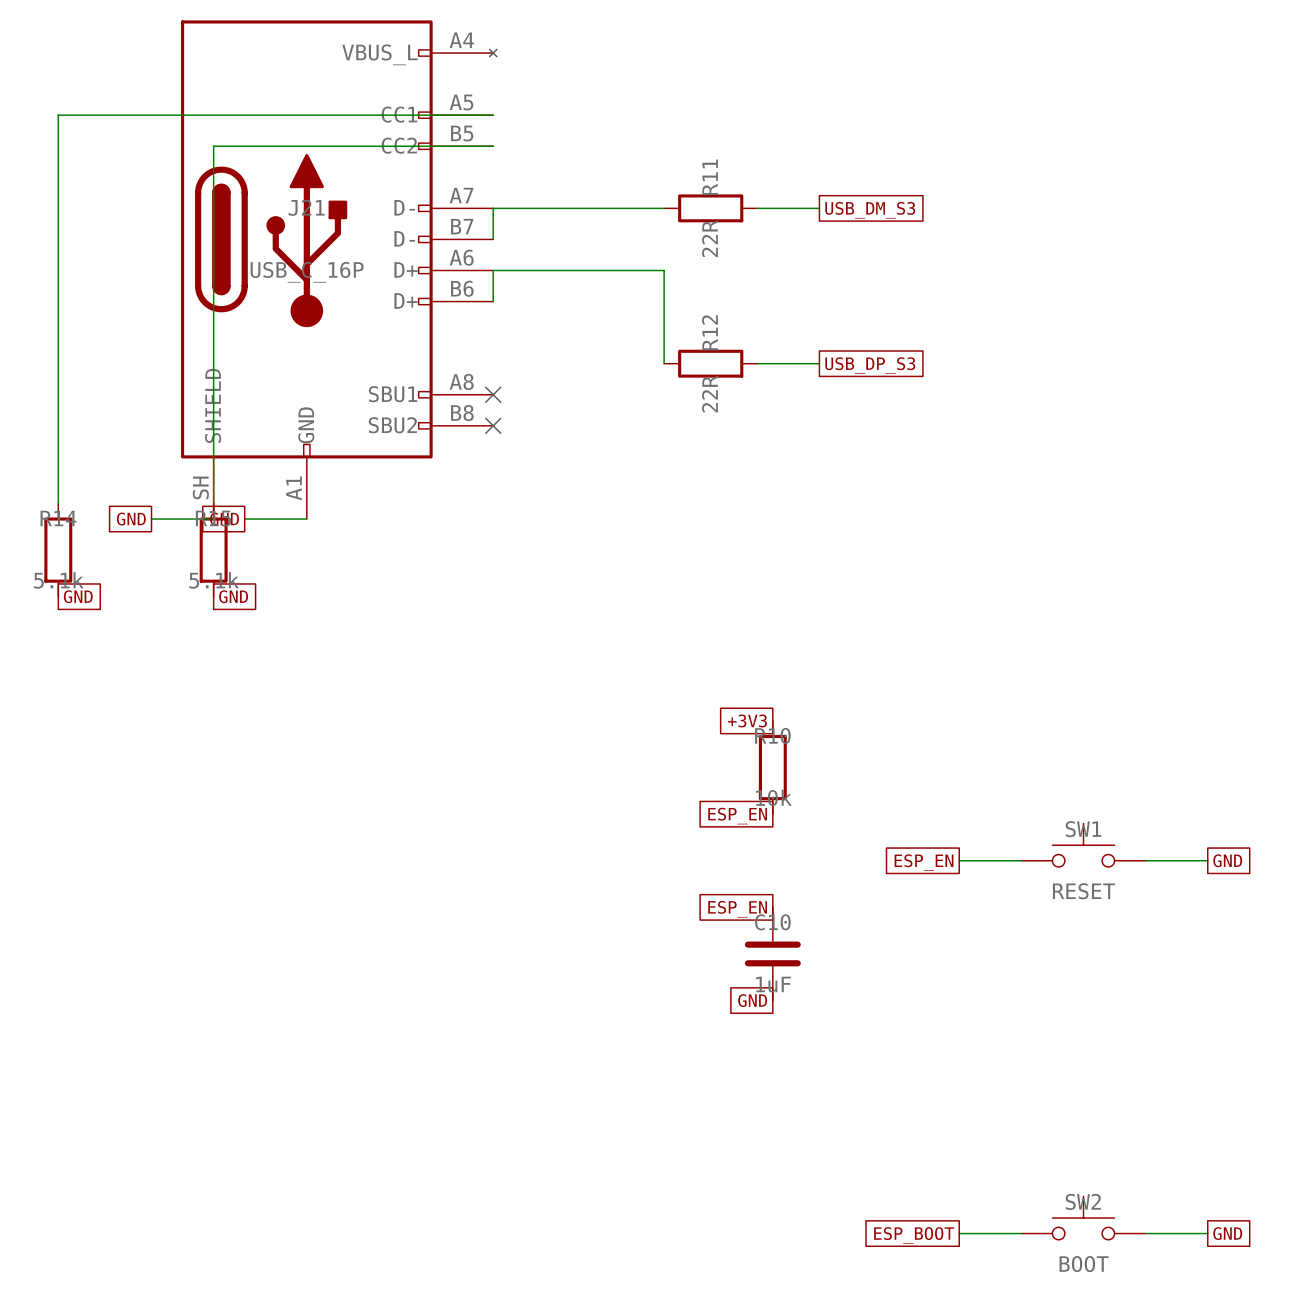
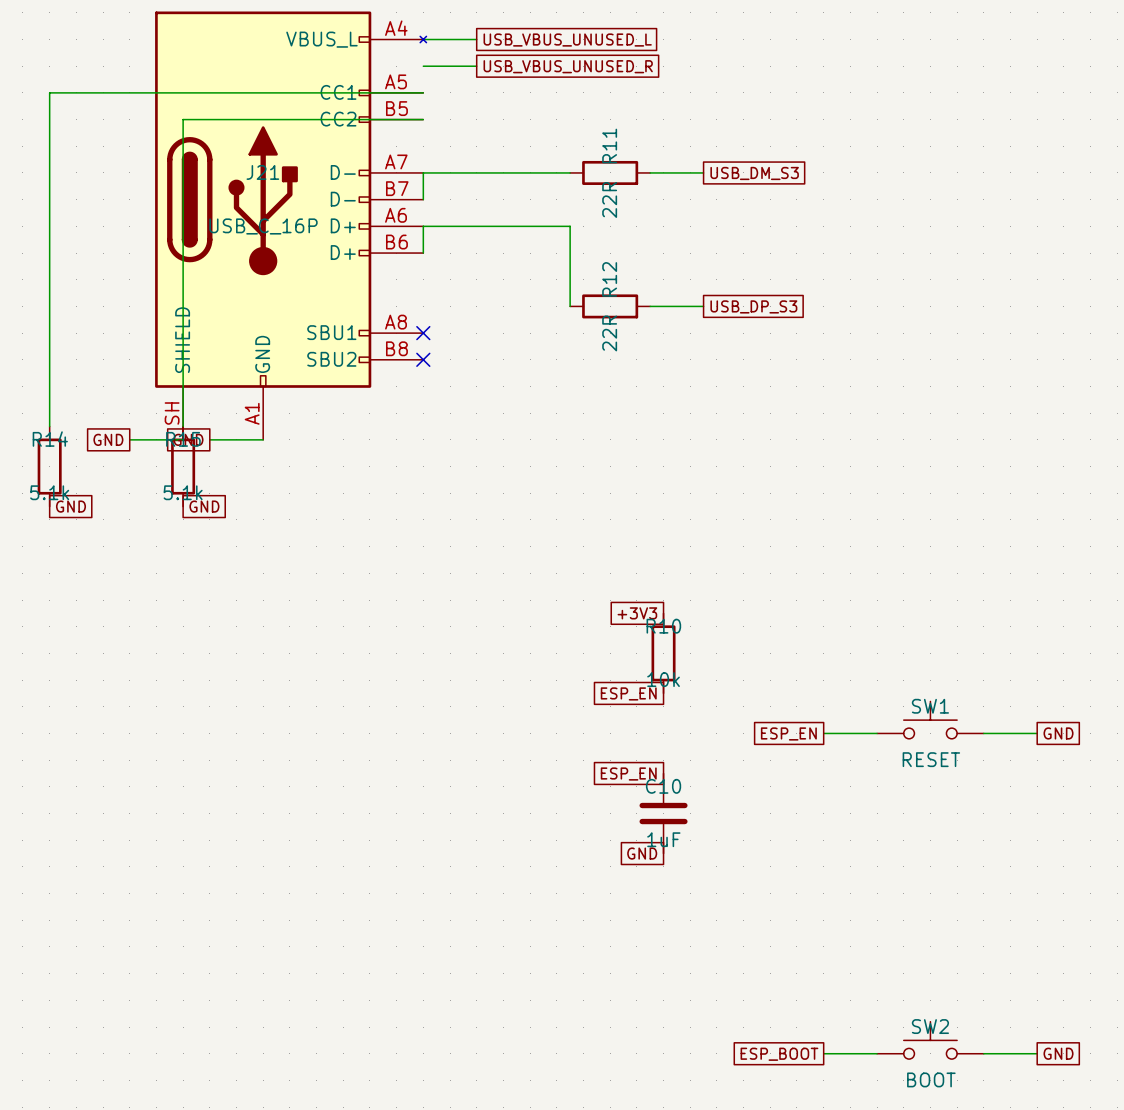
wire: none -> (423, 39) (476, 39)
global label: none -> USB_VBUS_UNUSED_L (567, 40)
wire: none -> (423, 66) (476, 66)
global label: none -> USB_VBUS_UNUSED_R (568, 66)

